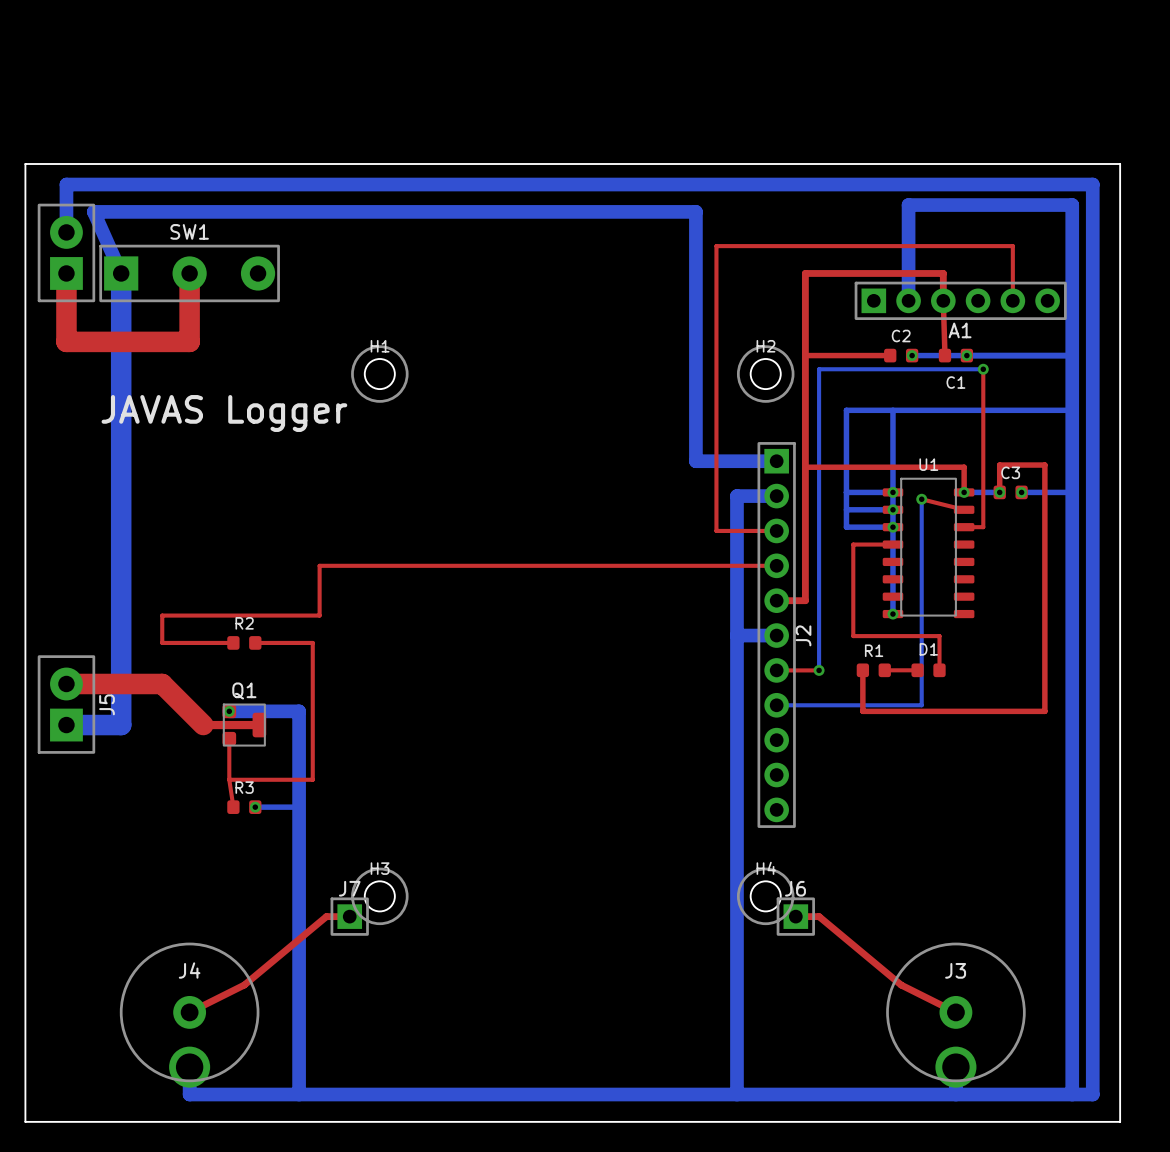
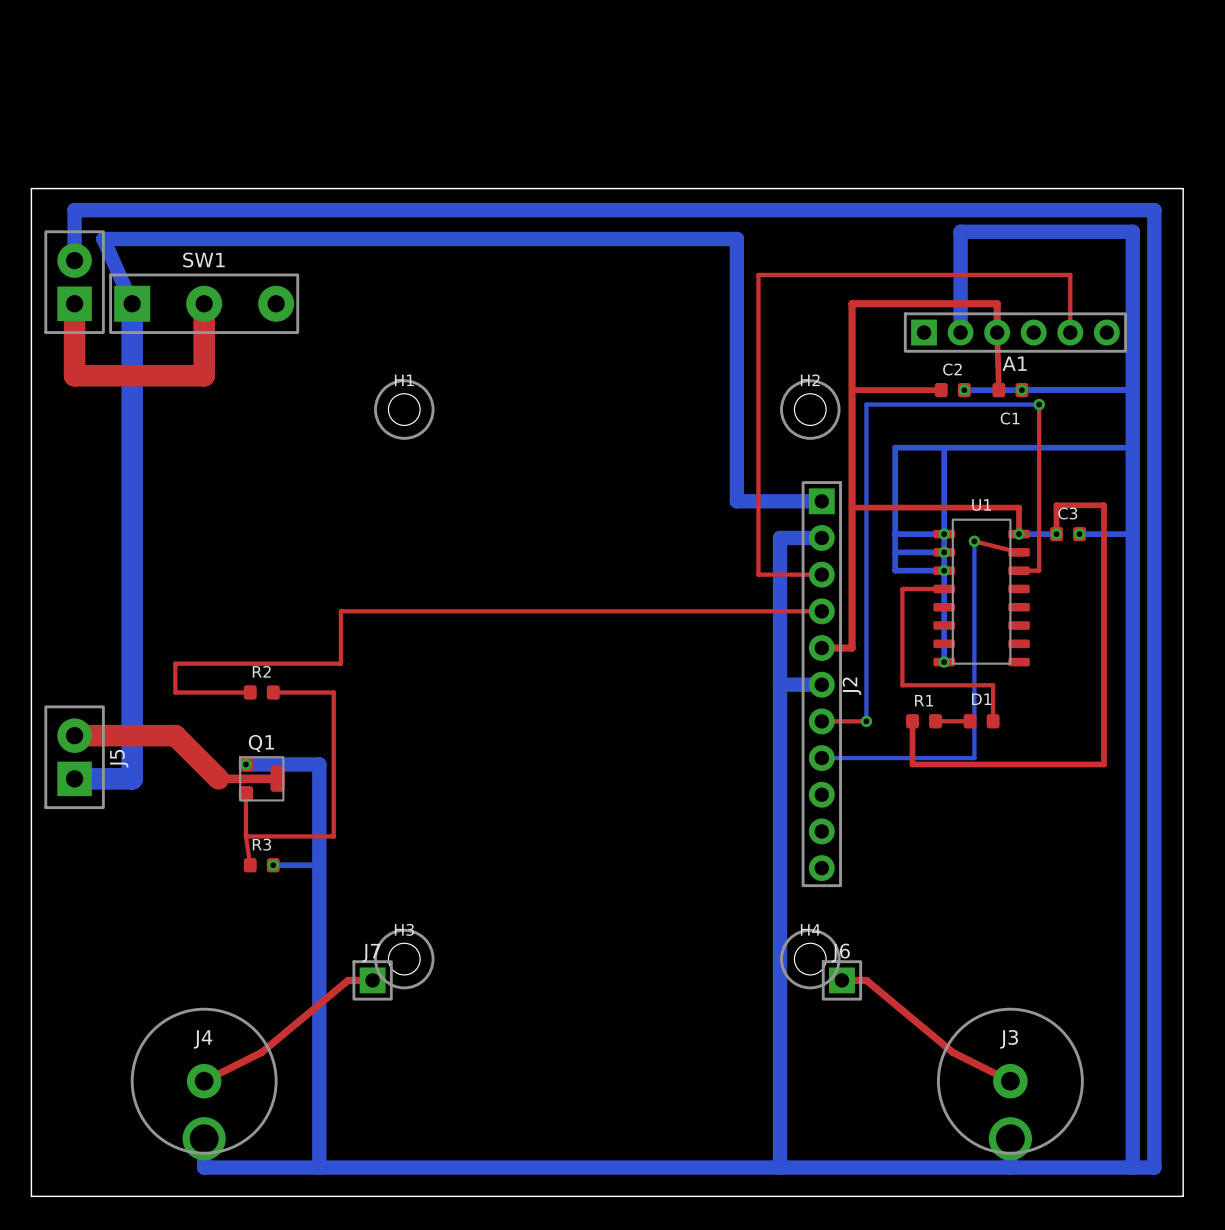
text: JAVAS Logger (224, 413) -> none

